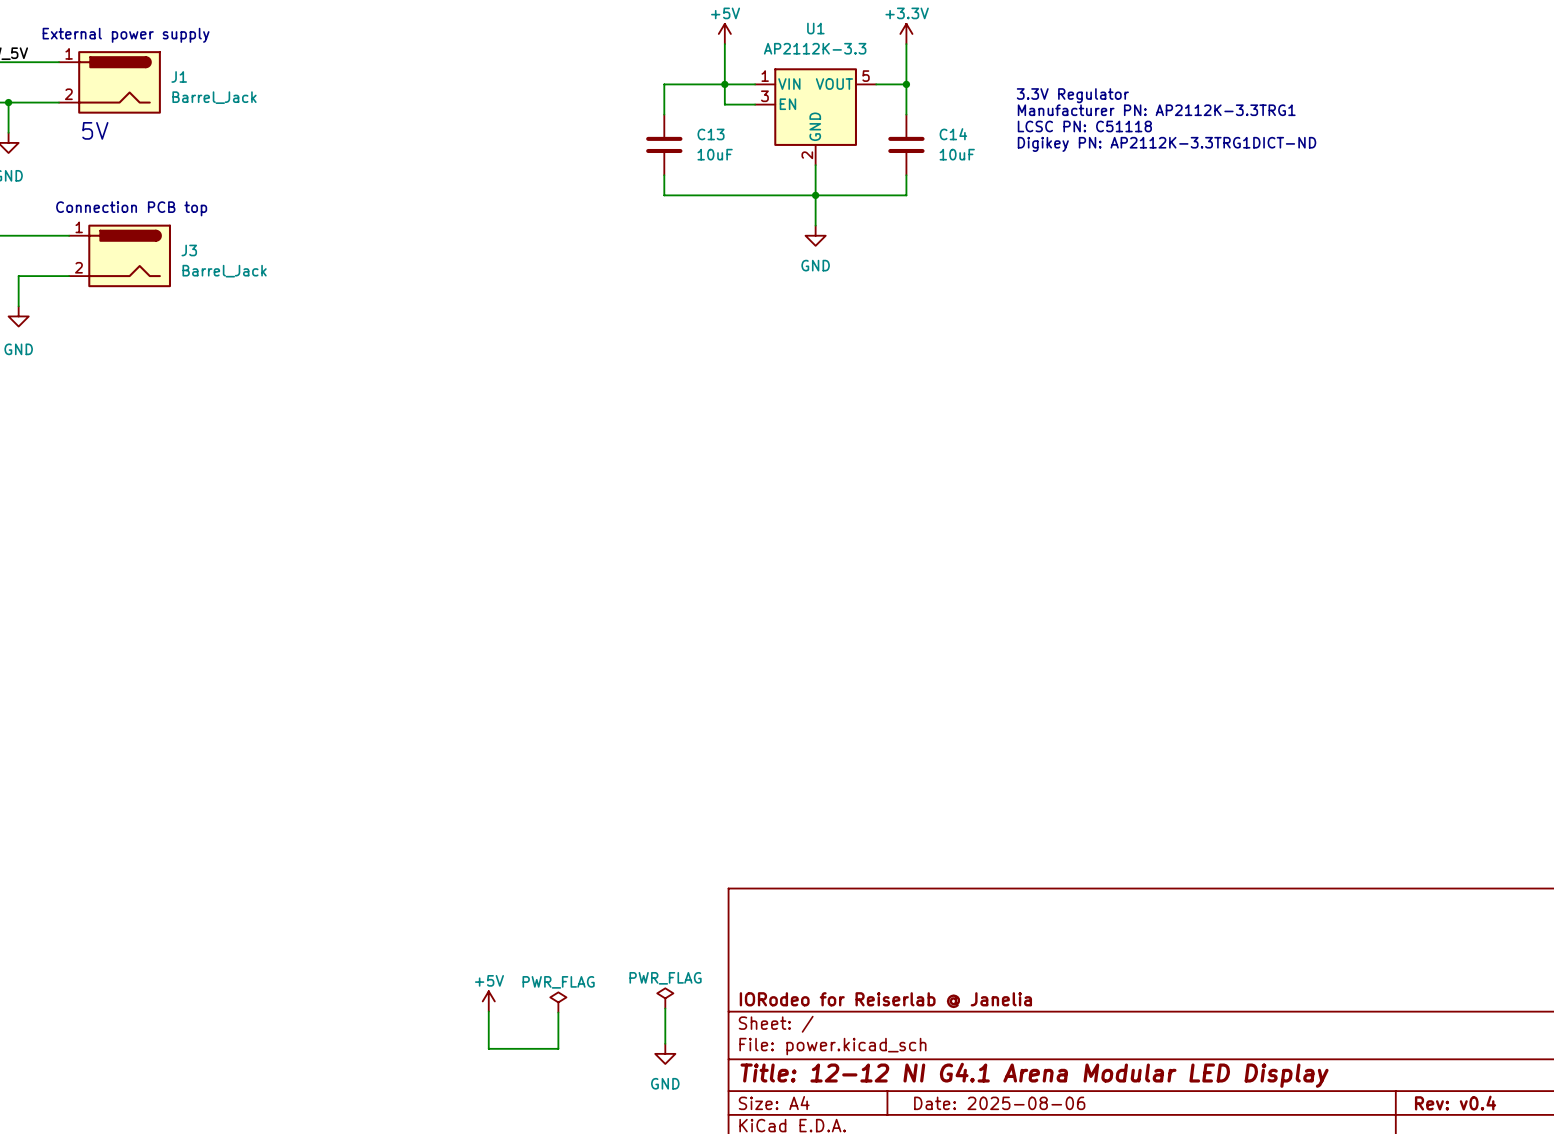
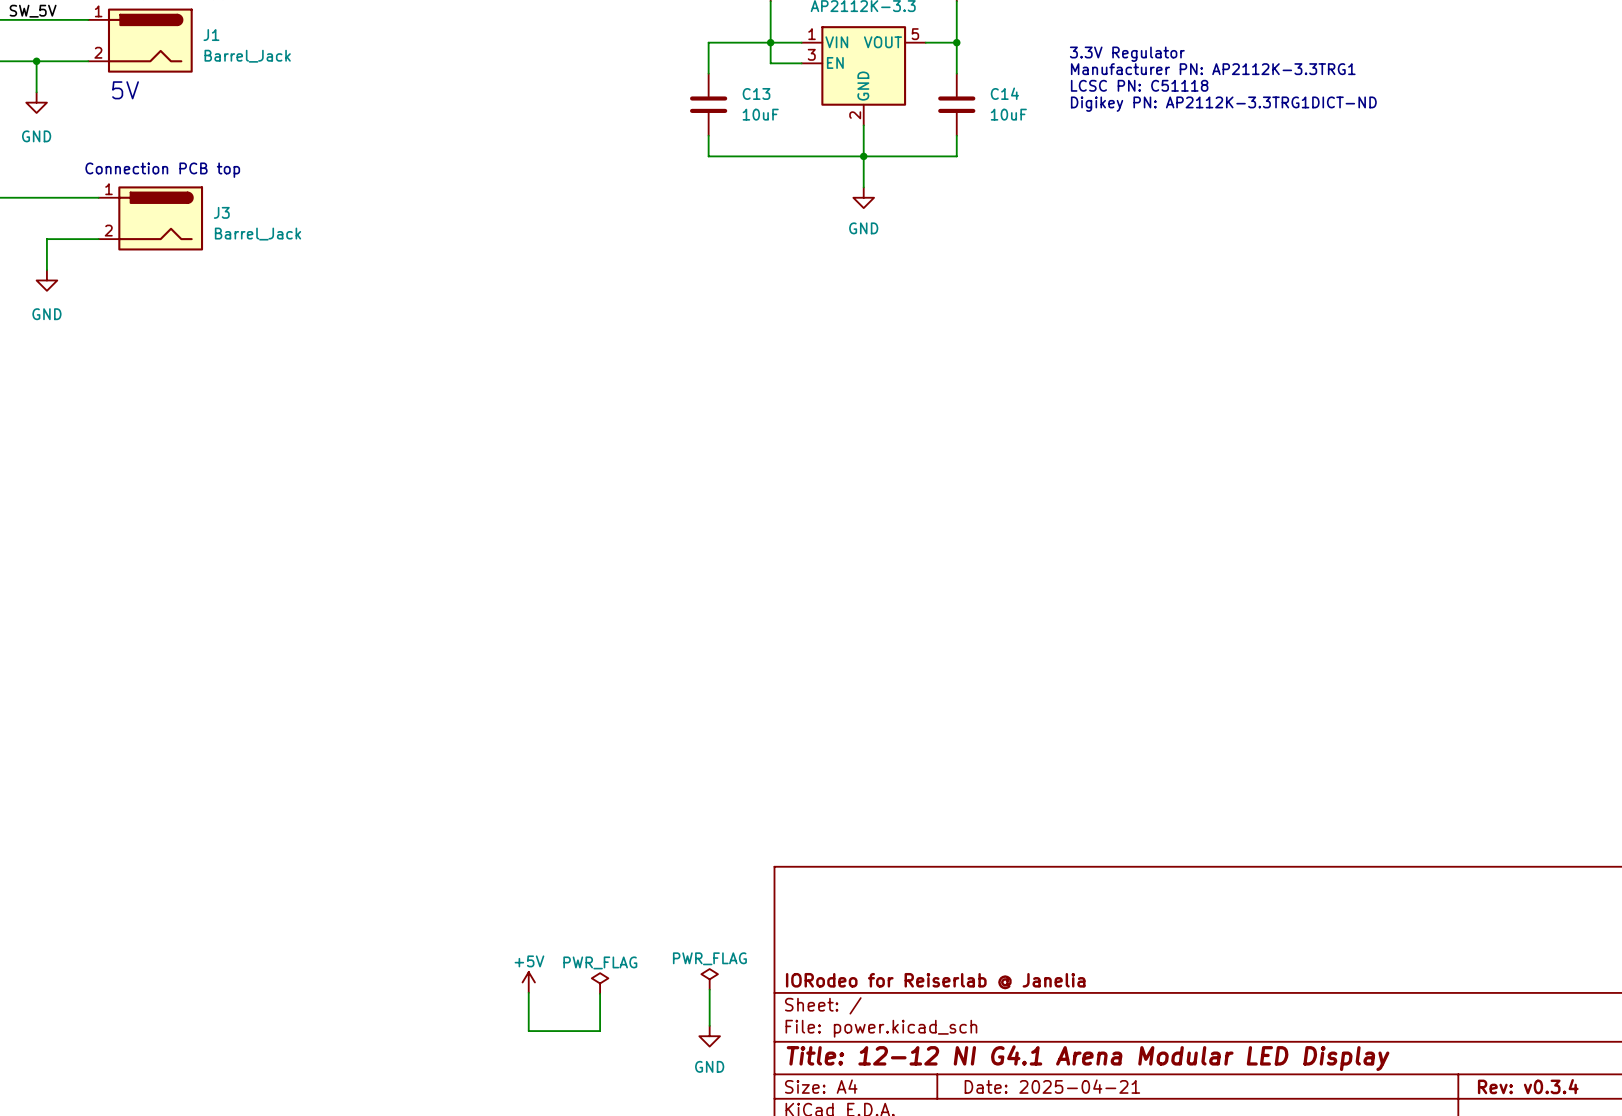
title block: Date: 2025-08-06 (999, 1103) -> Date: 2025-04-21 (1052, 1086)
title block: Rev: v0.4 (1455, 1103) -> Rev: v0.3.4 (1528, 1086)

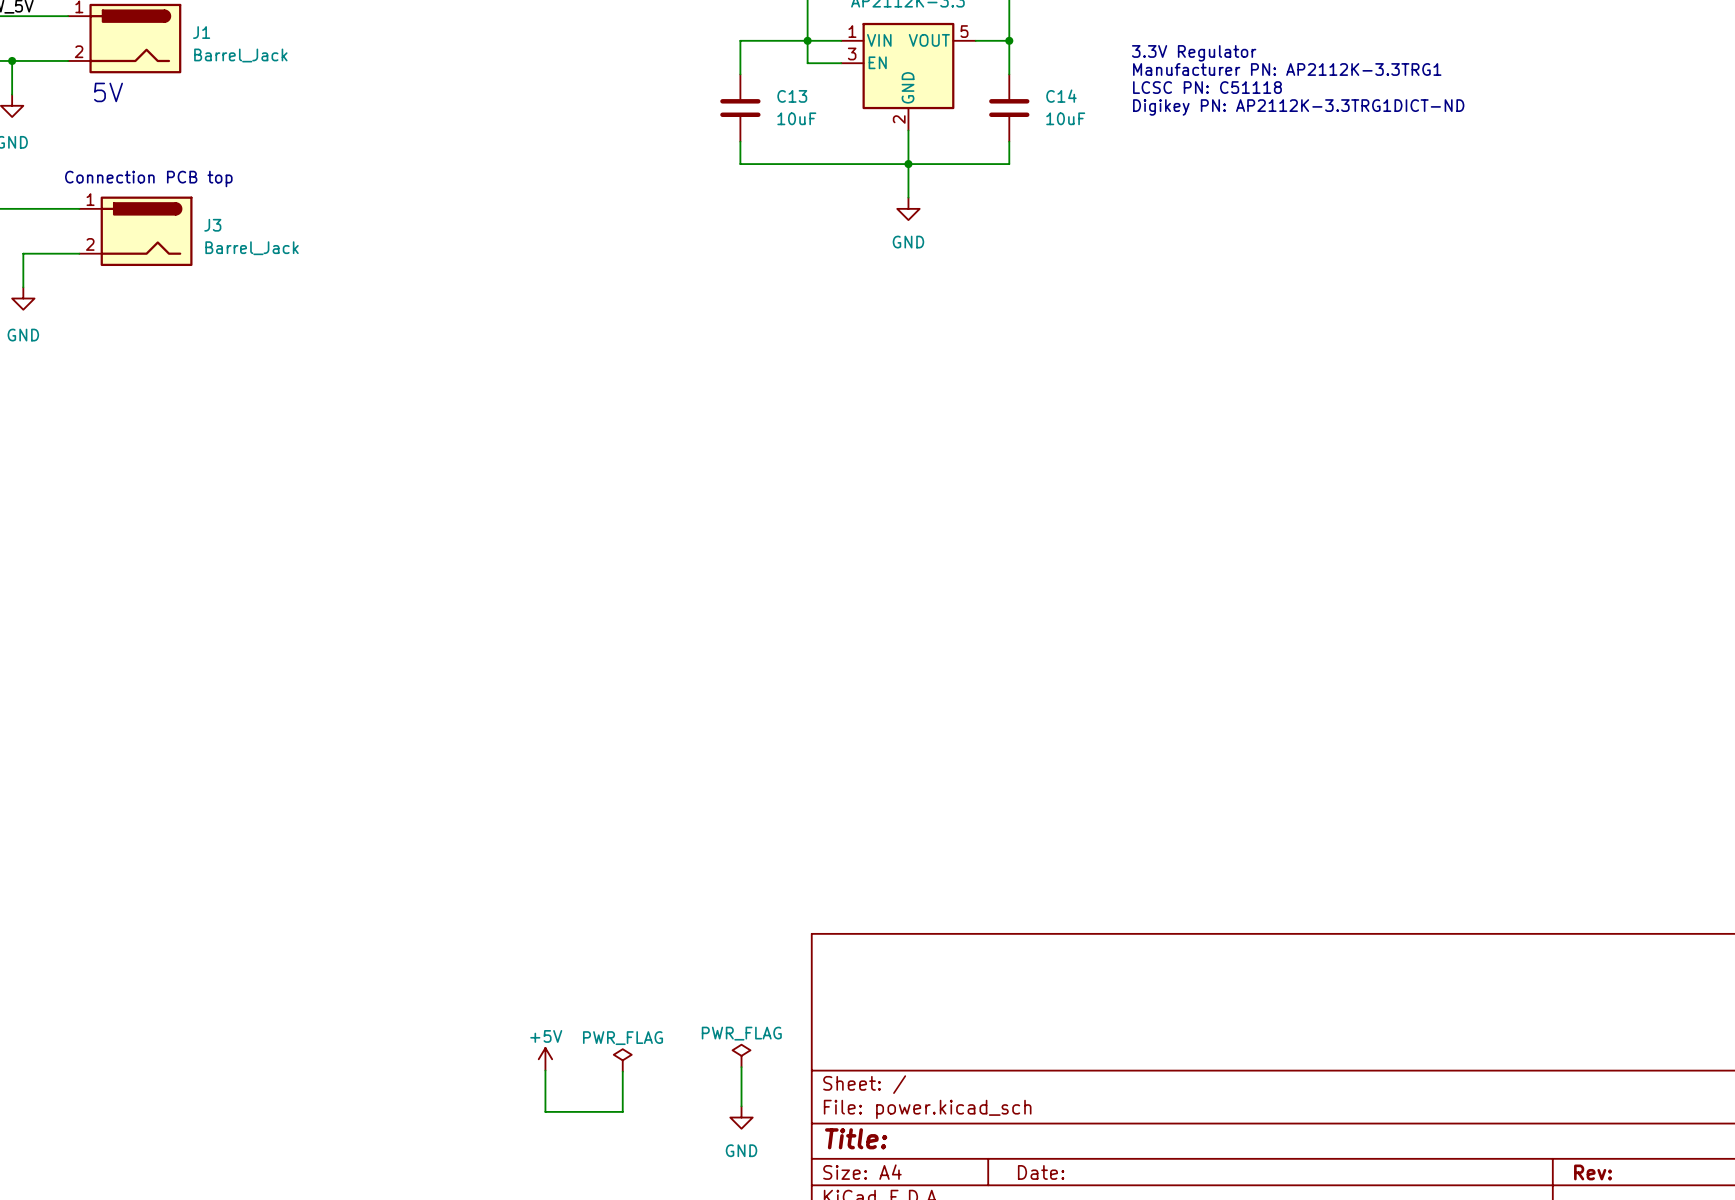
title block: IORodeo for Reiserlab @ Janelia (935, 981) -> none
title block: Title: 12-12 NI G4.1 Arena Modular LED Display (1088, 1058) -> Title: (856, 1138)
title block: Date: 2025-04-21 (1052, 1086) -> Date: (1041, 1172)
title block: Rev: v0.3.4 (1528, 1086) -> Rev: (1593, 1172)

